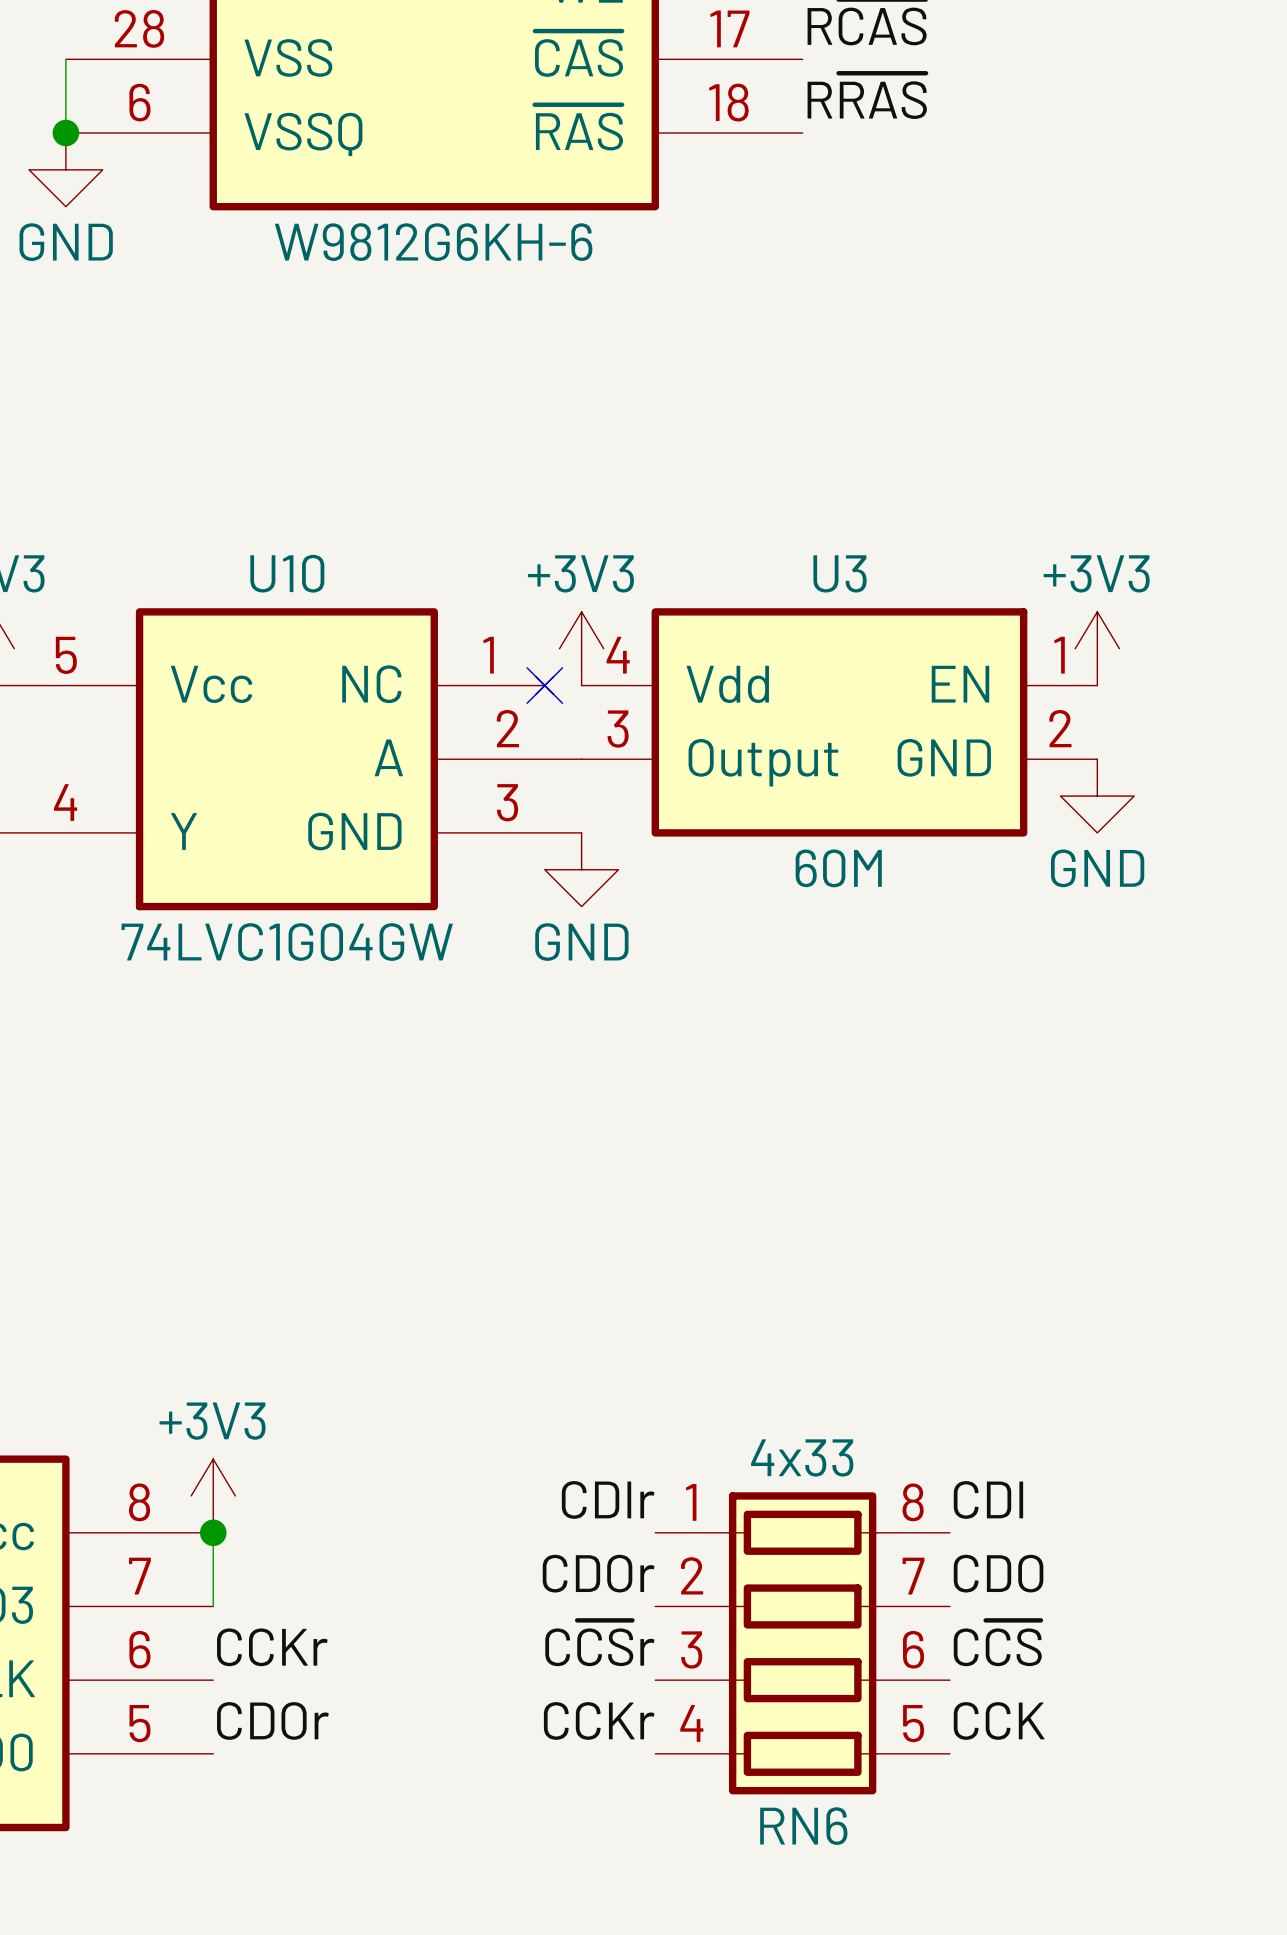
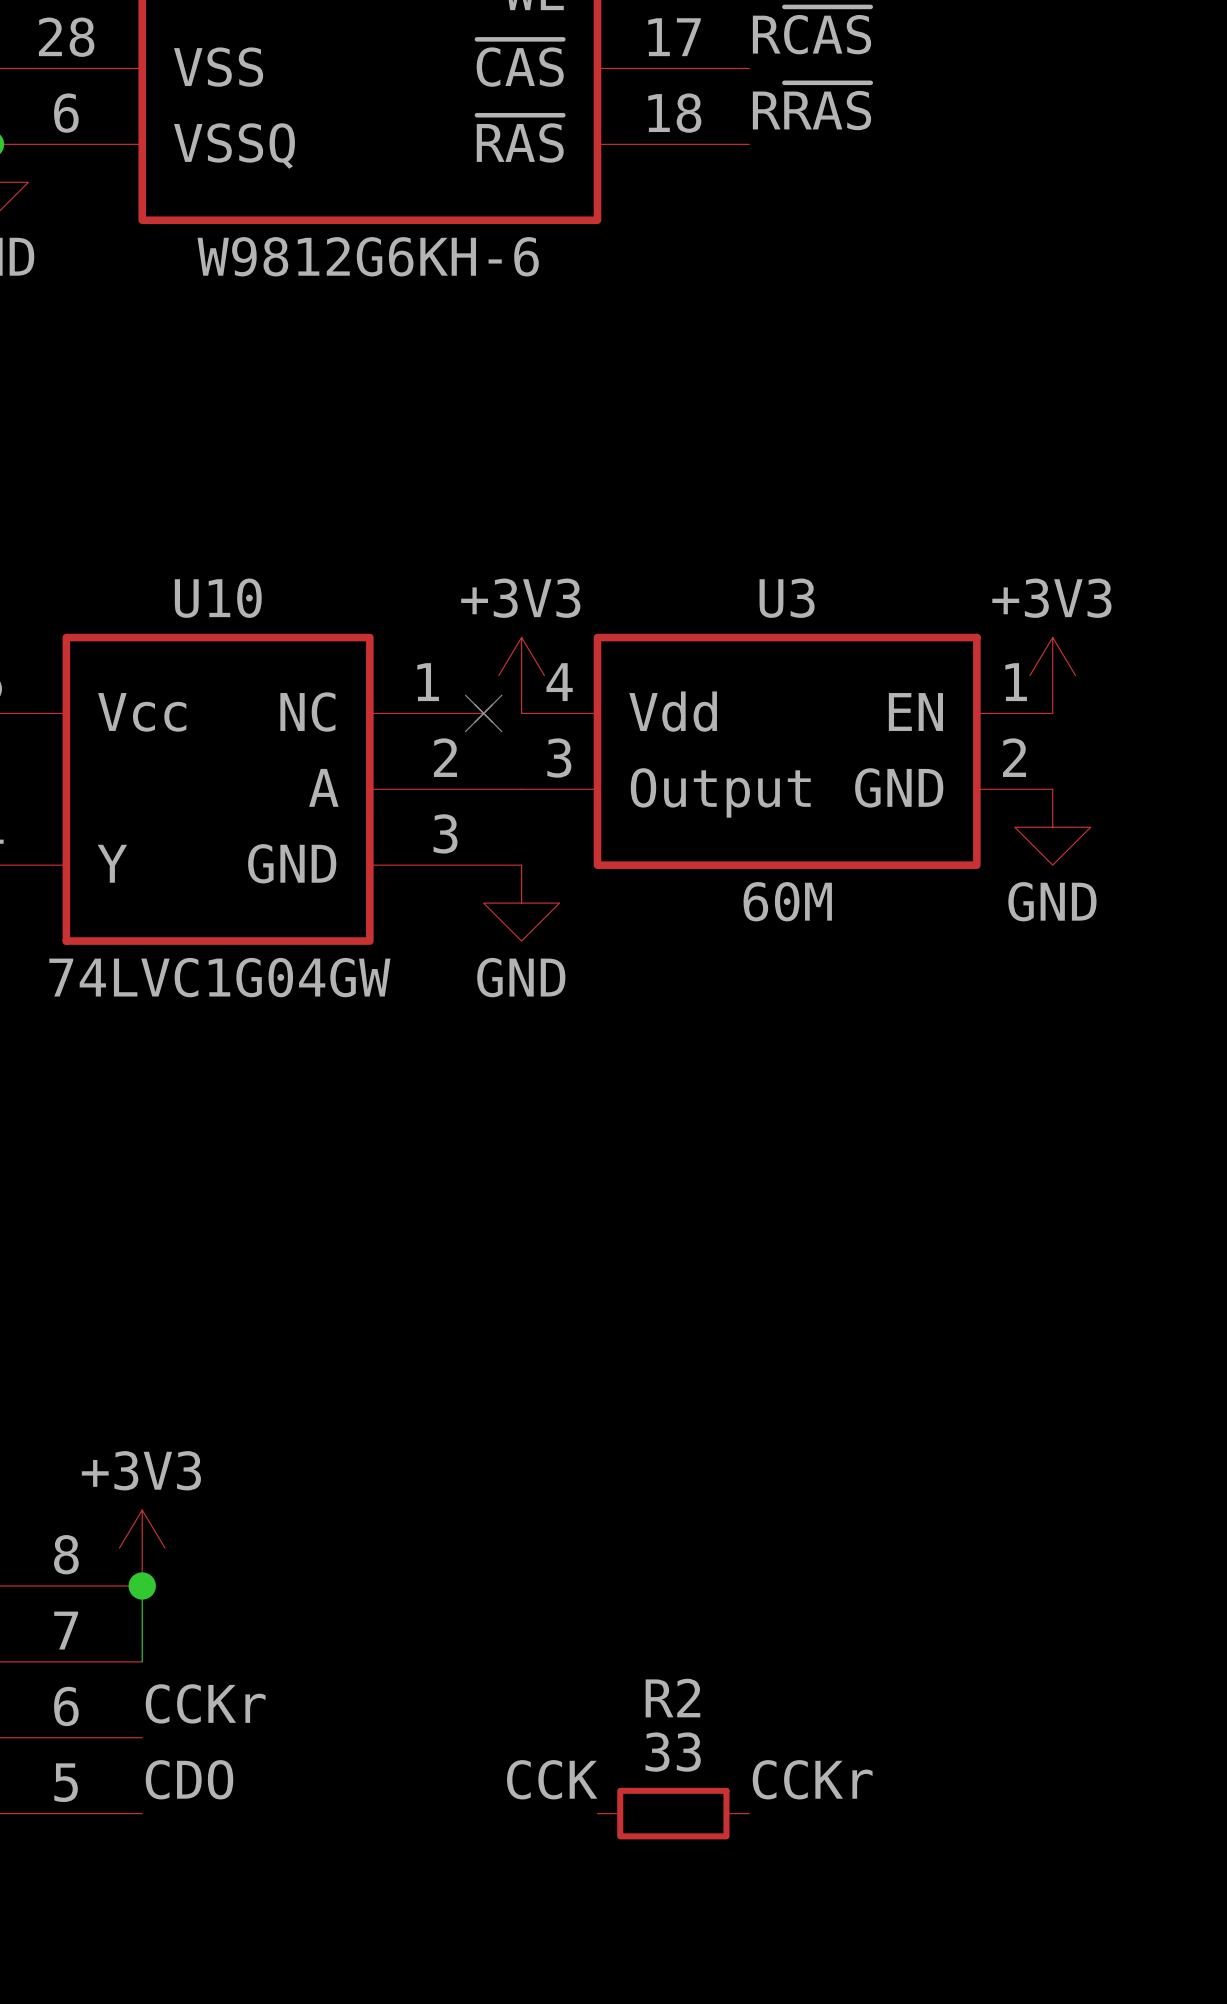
label: CDIr (608, 1499) -> none
label: CDI (988, 1499) -> none
label: CDOr (598, 1573) -> none
label: CDO (998, 1573) -> none
label: C~{CS}r (599, 1643) -> none
RN6: 4x33 (802, 1643) -> none
label: C~{CS} (997, 1643) -> none
label: CDOr (272, 1720) -> CDO (189, 1779)
label: CCKr (599, 1720) -> CCK (552, 1779)
label: CCK (999, 1720) -> CCKr (812, 1779)
R2: none -> 33 (673, 1813)

